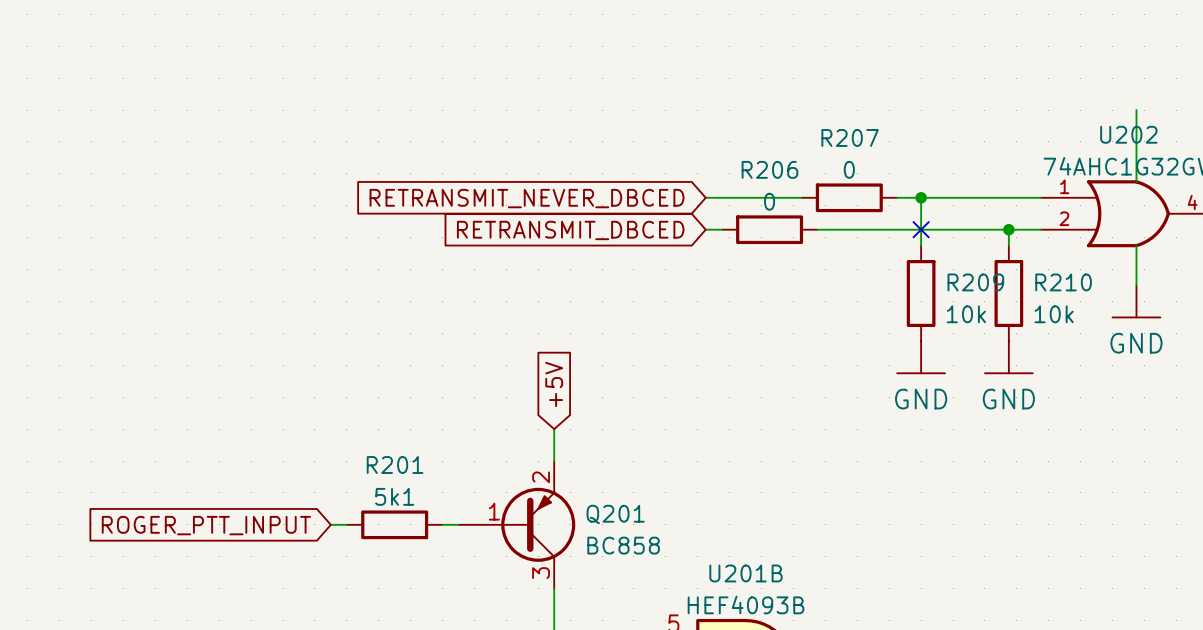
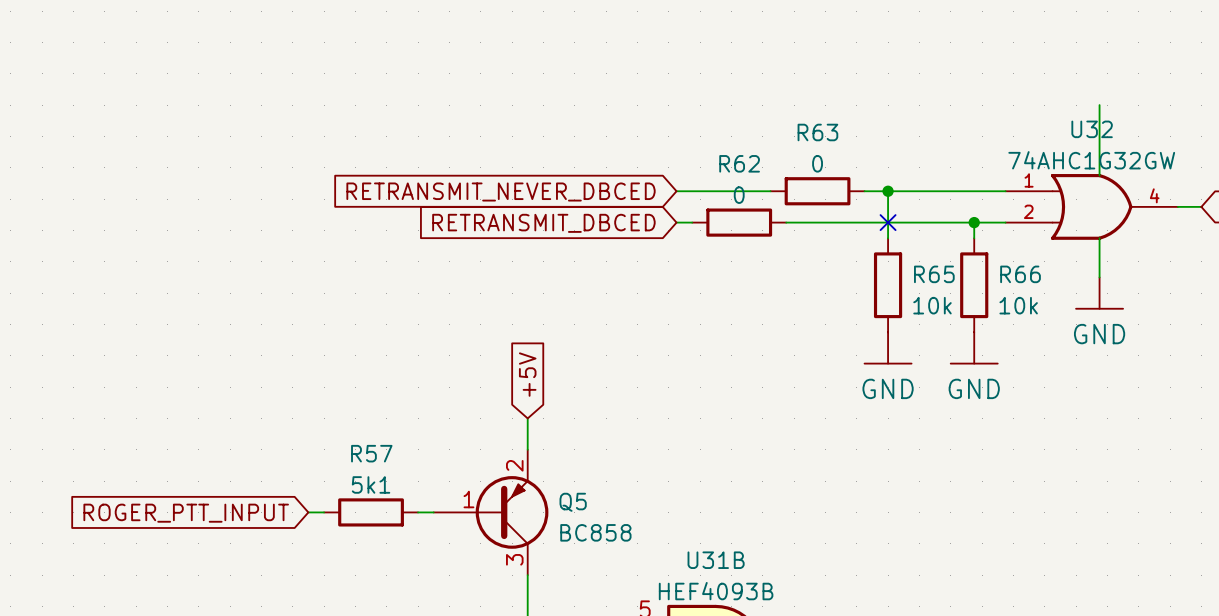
U202 name: U202 (1128, 134) -> U32 (1092, 129)
R207 name: R207 (850, 137) -> R63 (817, 132)
R206 name: R206 (769, 169) -> R62 (739, 163)
R209 name: R209 (975, 282) -> R65 (934, 274)
R210 name: R210 (1063, 282) -> R66 (1020, 274)
R201 name: R201 (395, 464) -> R57 (371, 453)
Q201 name: Q201 (615, 514) -> Q5 (573, 502)
U201B name: U201B (746, 573) -> U31B (716, 560)

